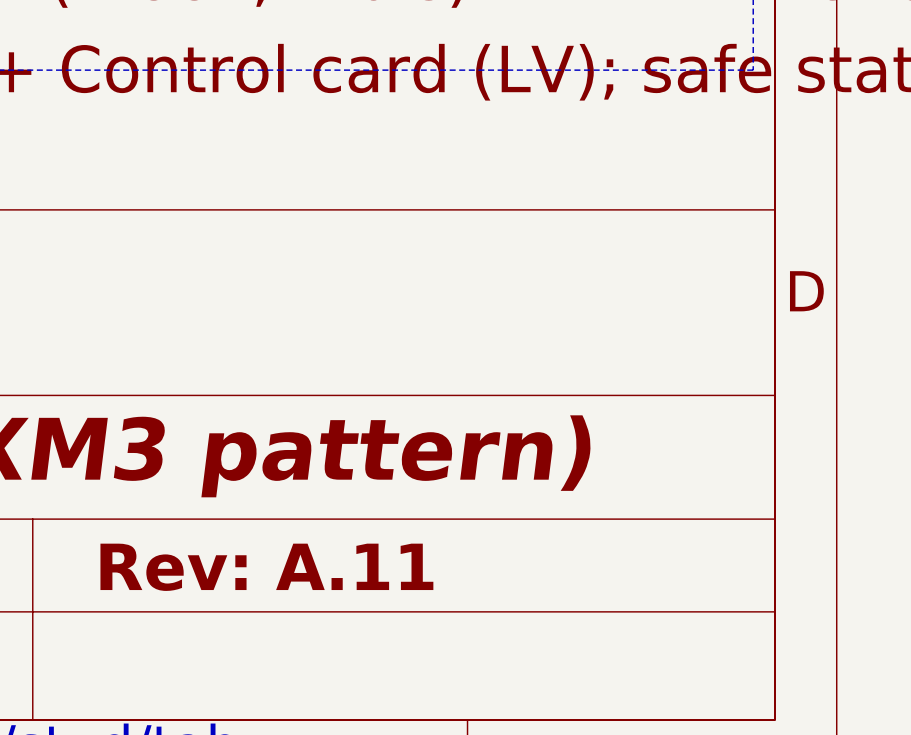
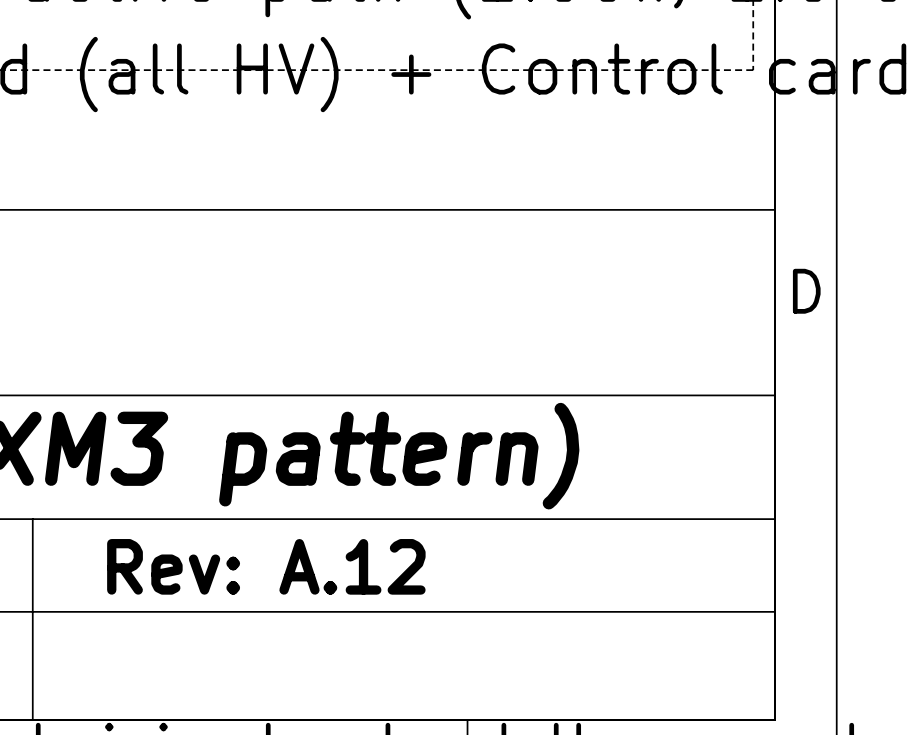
title block: Rev: A.11 (266, 567) -> Rev: A.12 (266, 566)

